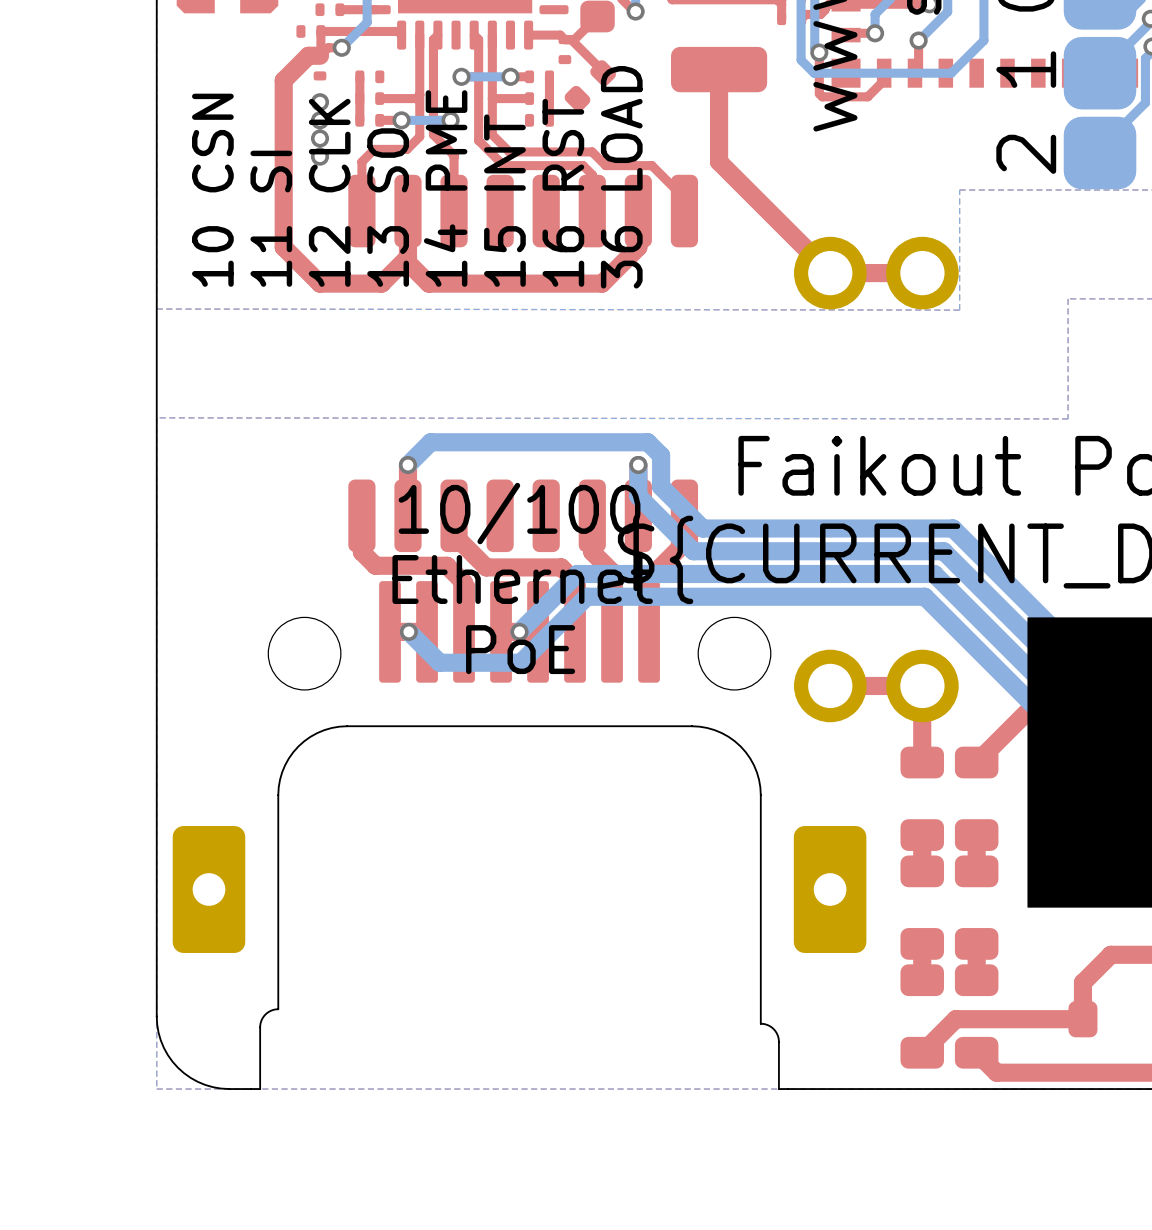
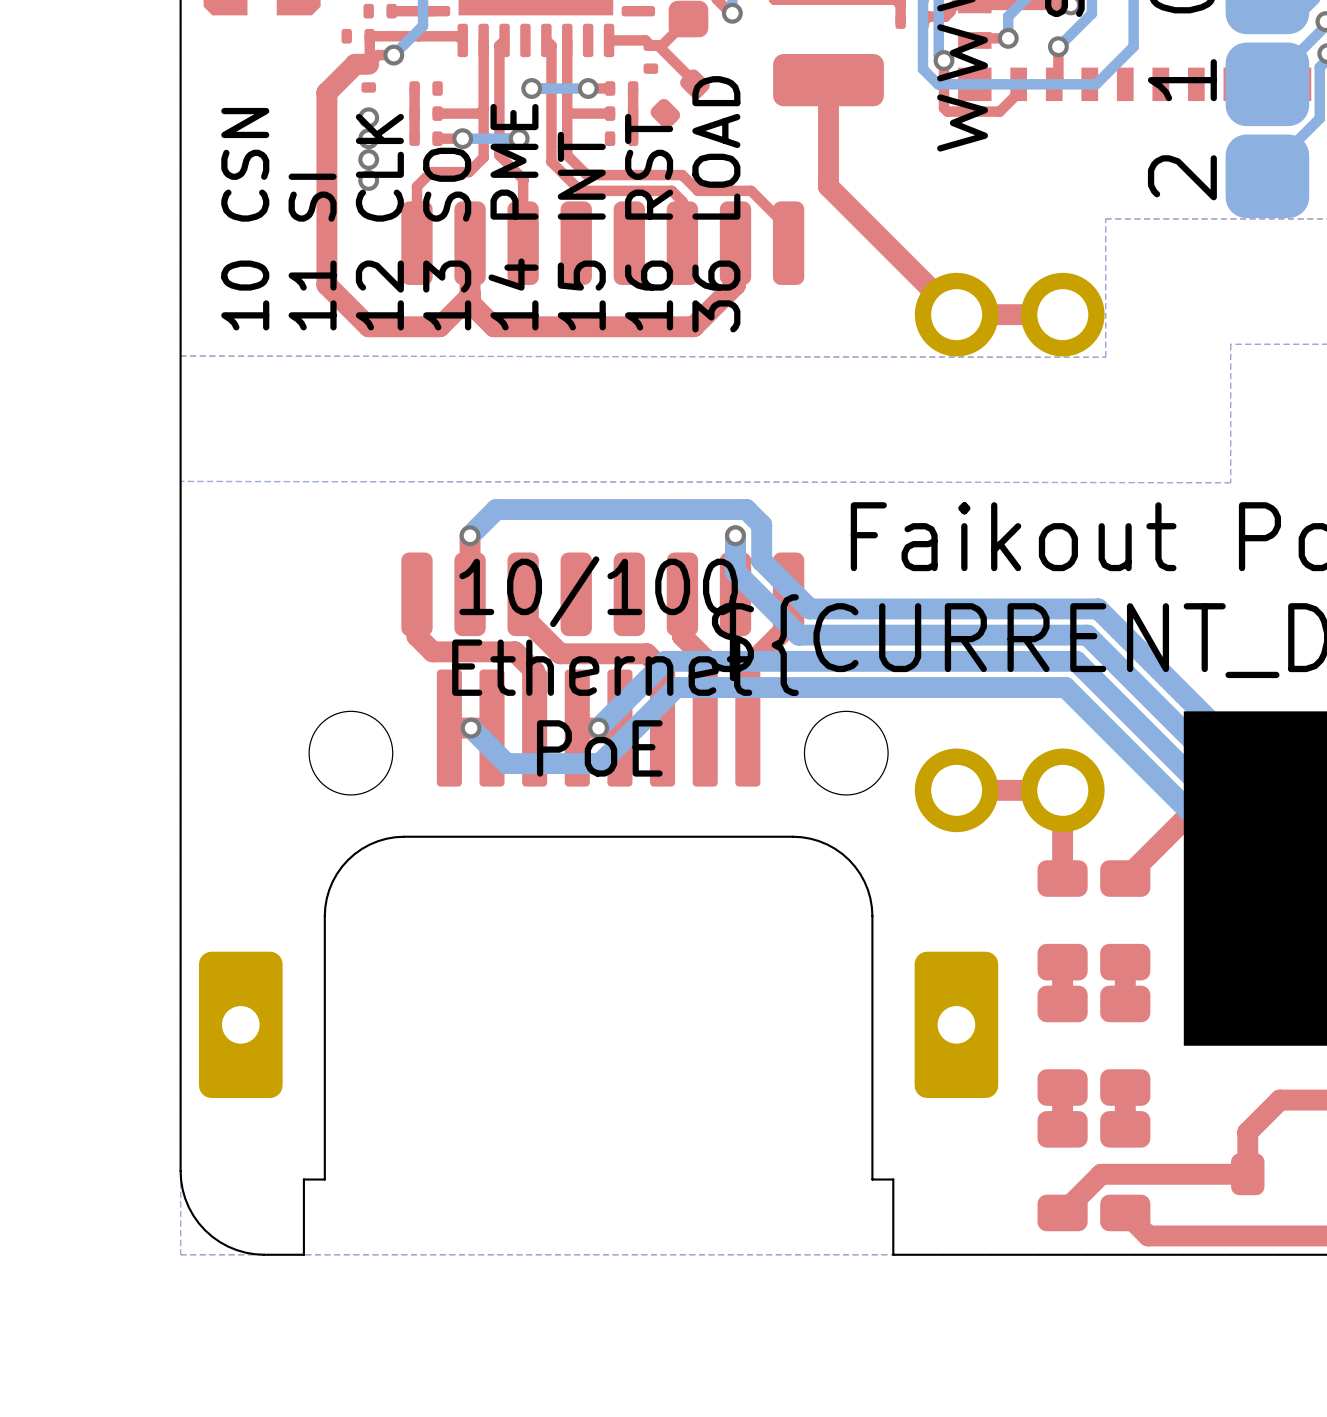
part footprint: [172, 581, 867, 1090] -> [198, 669, 999, 1256]
board edge: none -> (303, 1254) (289, 1254)
board edge: none -> (907, 1254) (893, 1254)

